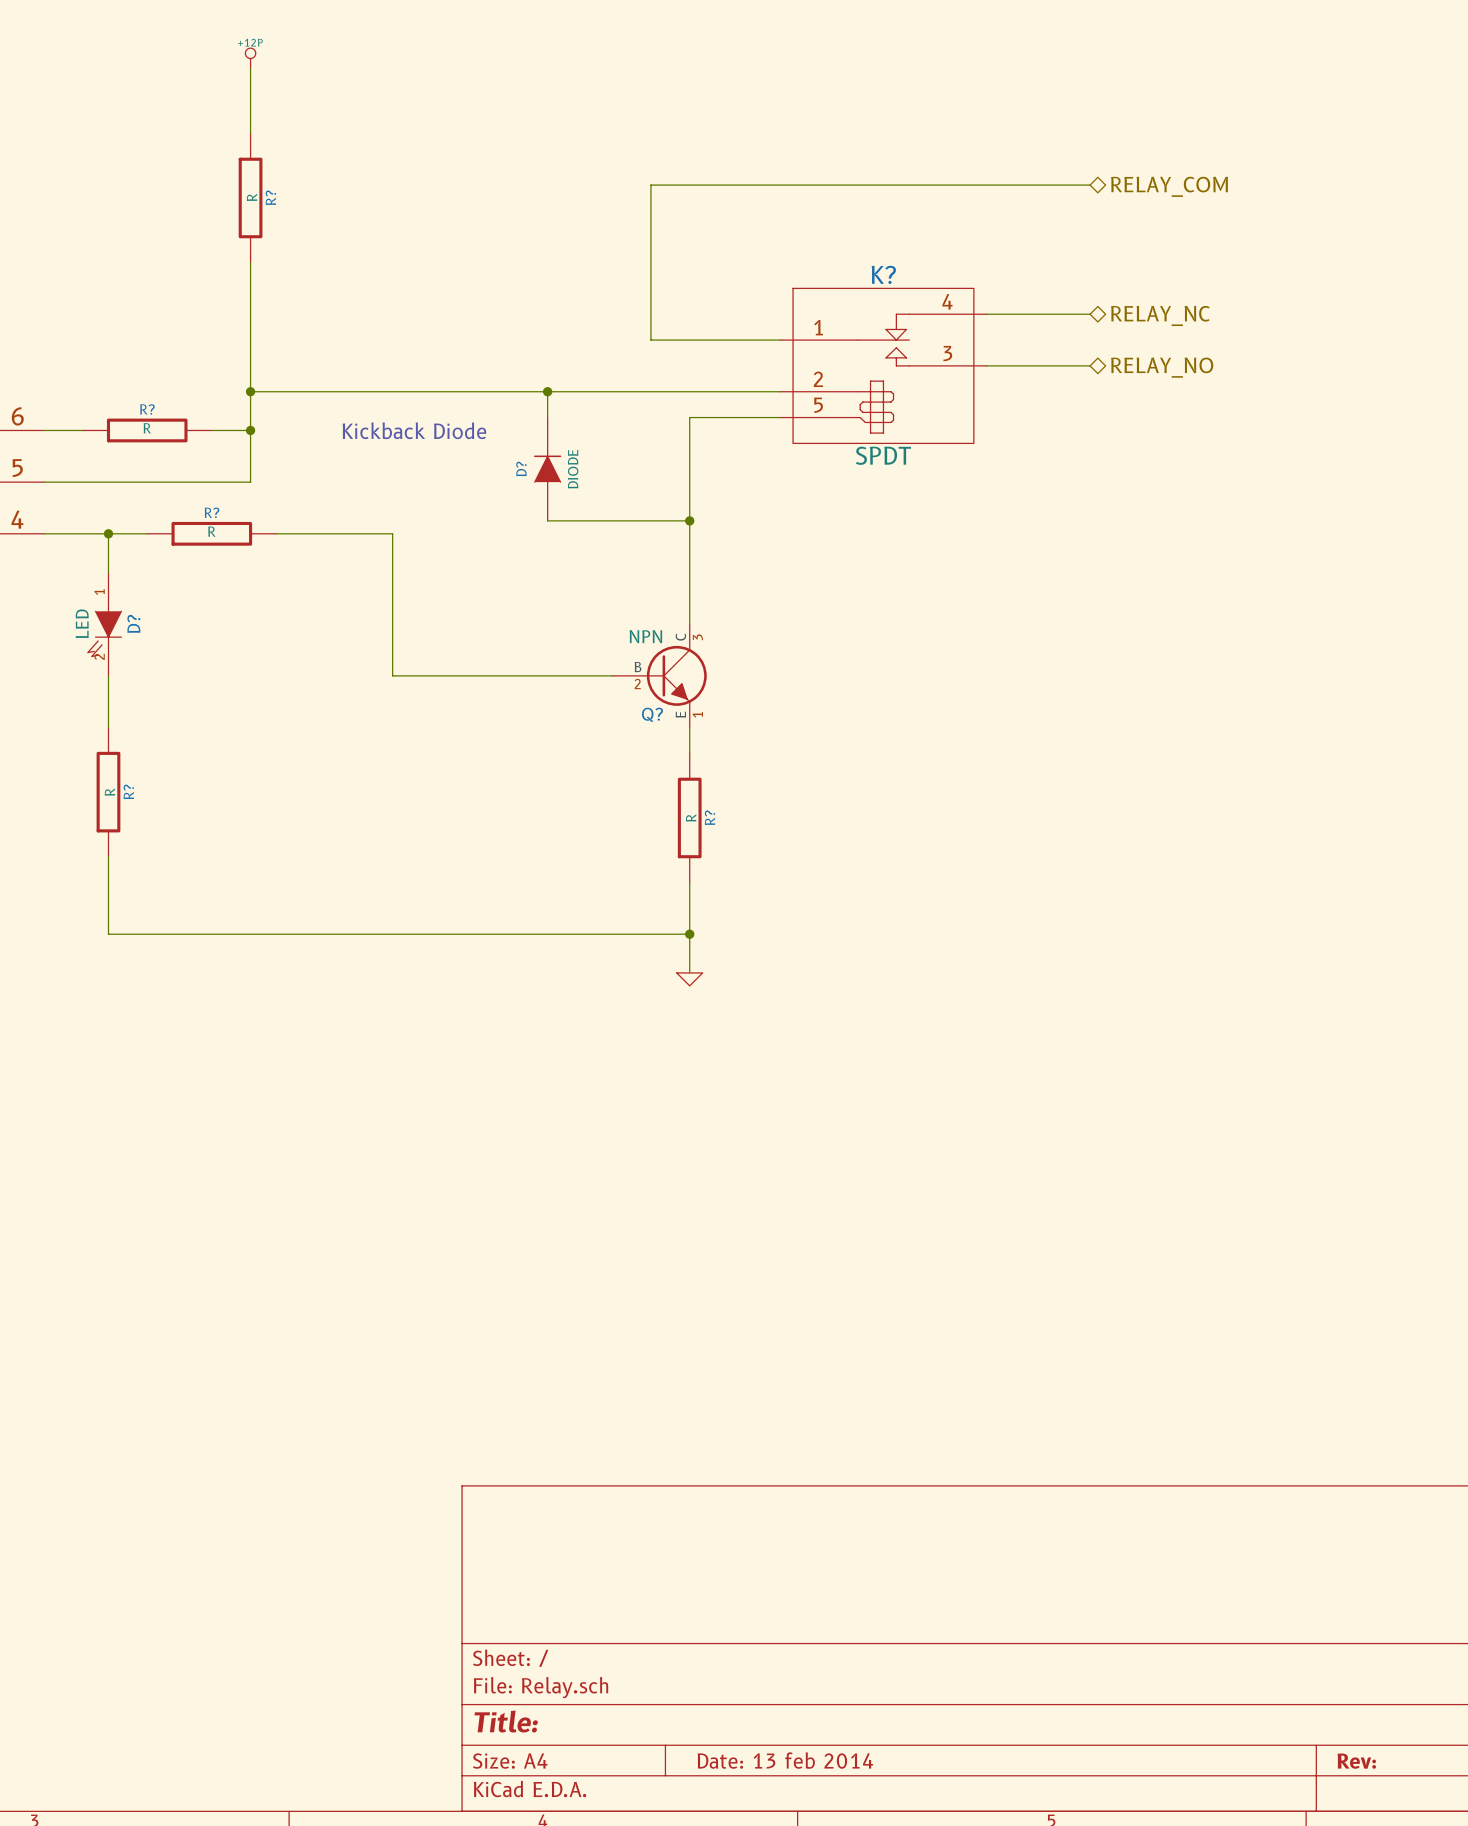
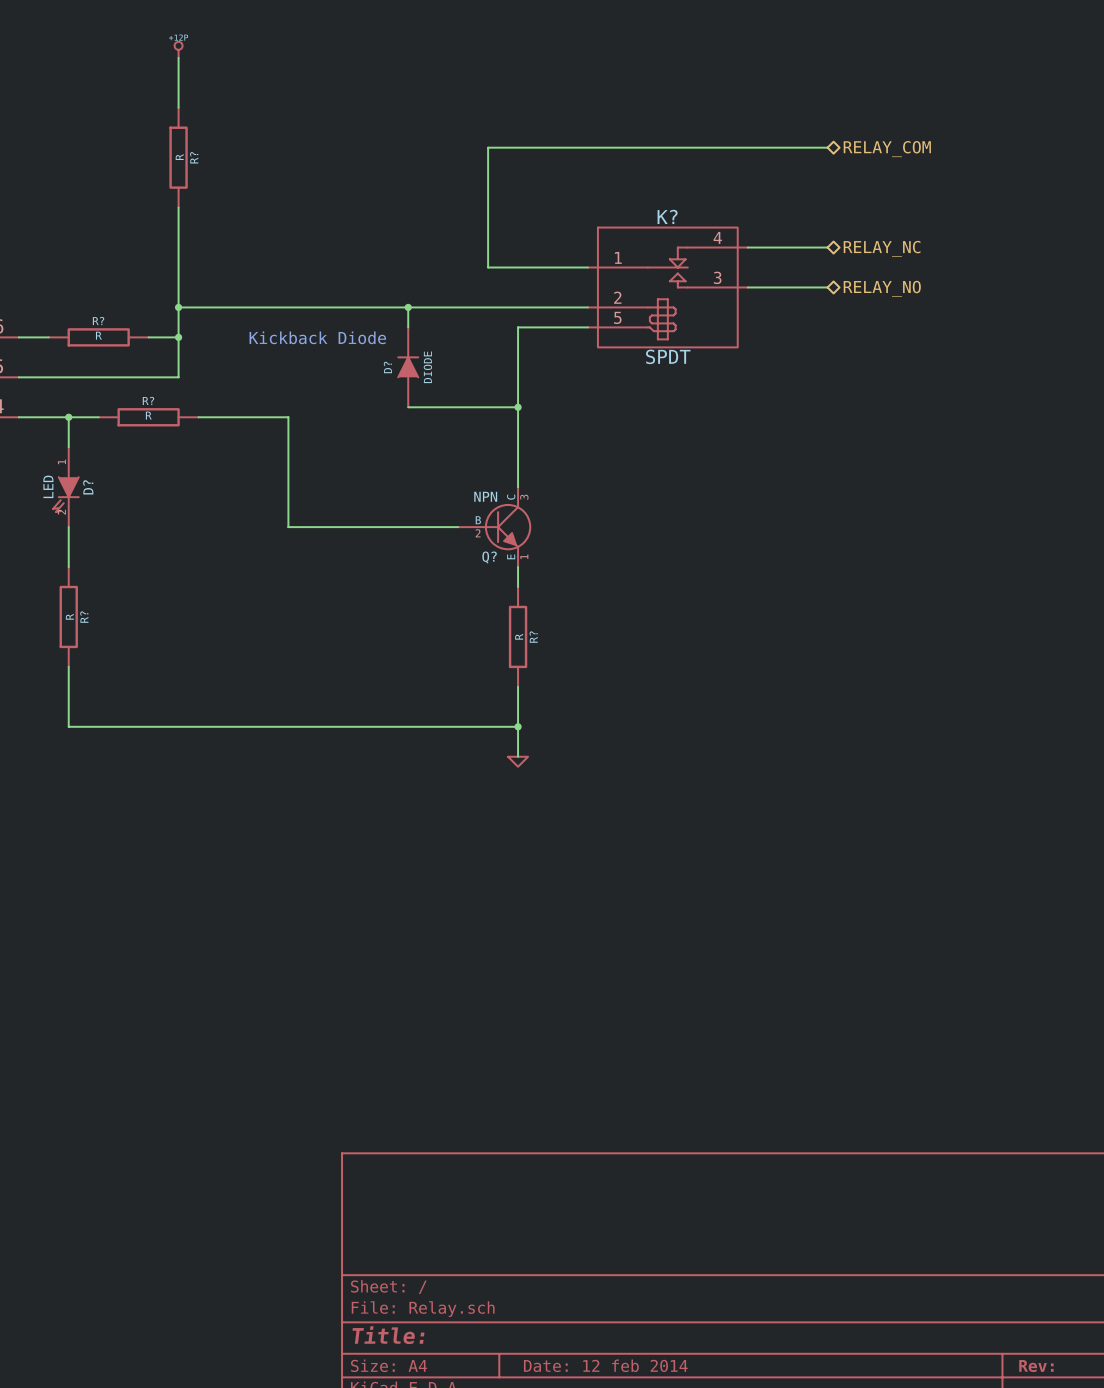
title block: Date: 13 feb 2014 (785, 1760) -> Date: 12 feb 2014 (605, 1365)

